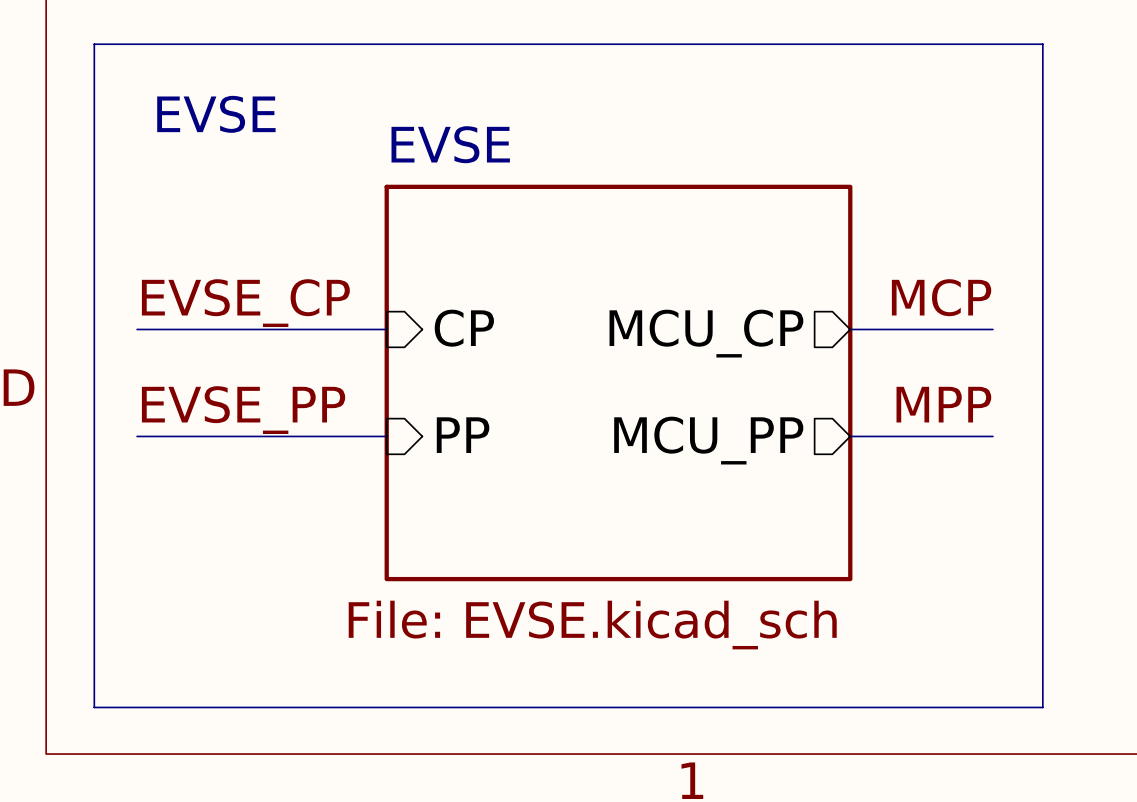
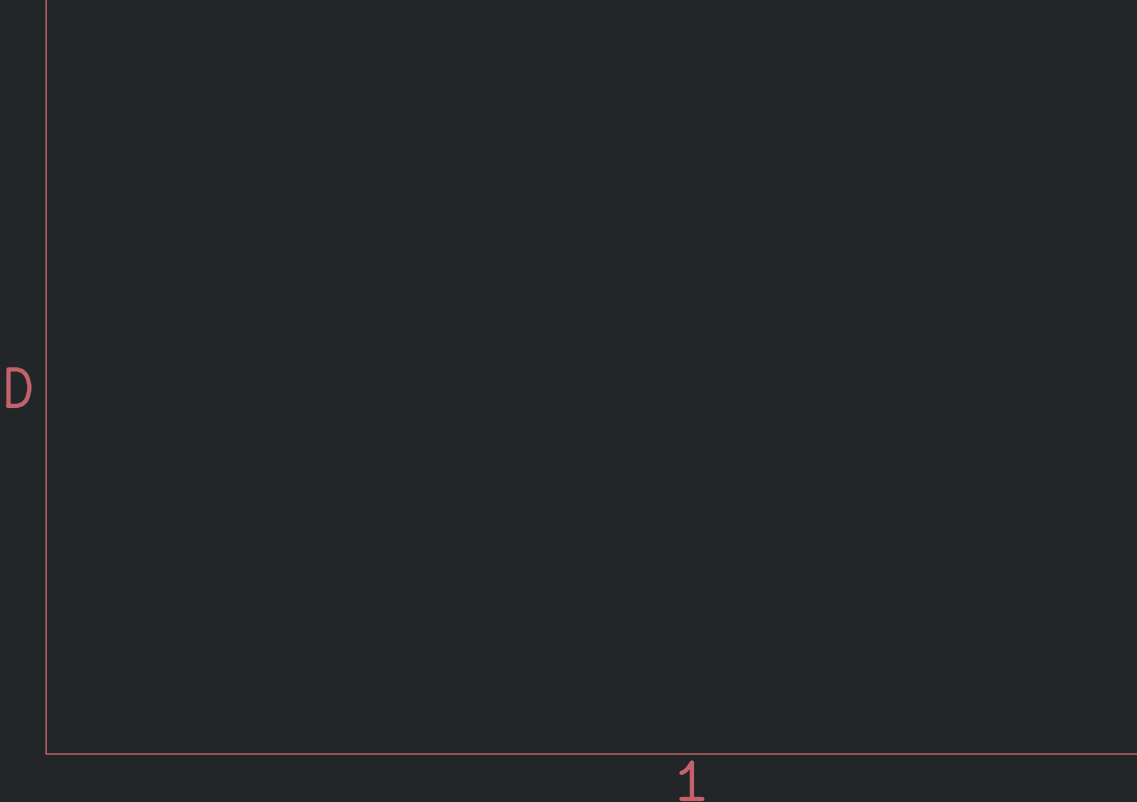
line: (94, 44) (94, 707) (1042, 707) (1042, 44) (94, 44) -> none
text: EVSE (216, 114) -> none
label: MCP (941, 297) -> none
label: EVSE_CP (245, 303) -> none
sheet pin: CP (464, 328) -> none
wire: (137, 329) (386, 329) -> none
wire: (850, 329) (992, 329) -> none
sheet pin: MCU_CP (706, 333) -> none
sheet EVSE: File: EVSE.kicad_sch (618, 382) -> none
label: MPP (943, 404) -> none
label: EVSE_PP (243, 410) -> none
sheet pin: PP (463, 435) -> none
wire: (137, 436) (386, 436) -> none
wire: (850, 436) (992, 436) -> none
sheet pin: MCU_PP (708, 440) -> none

